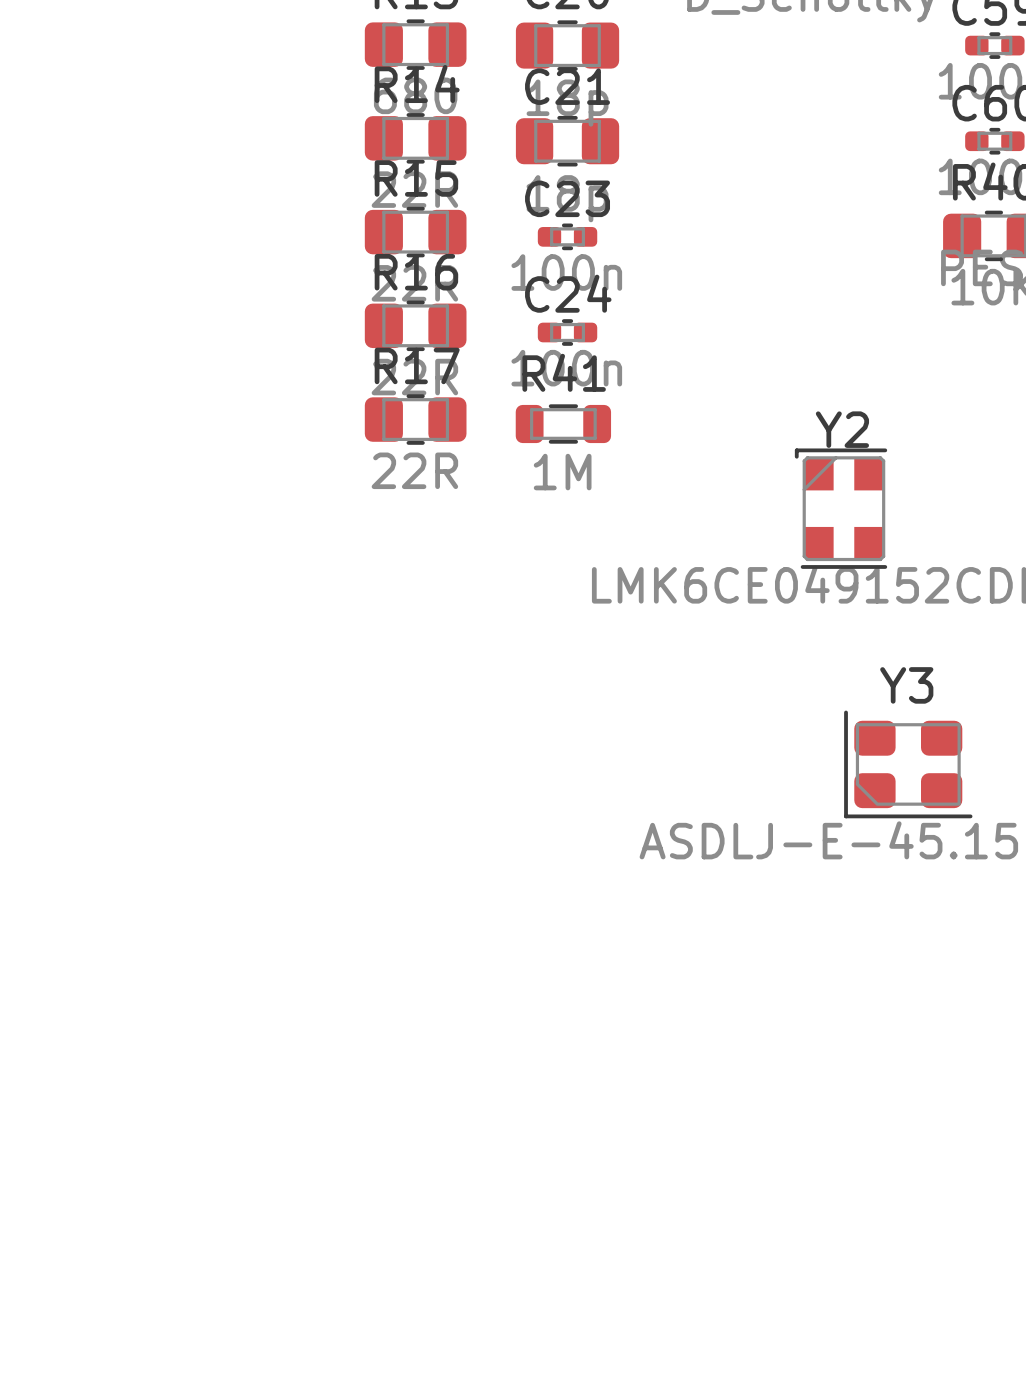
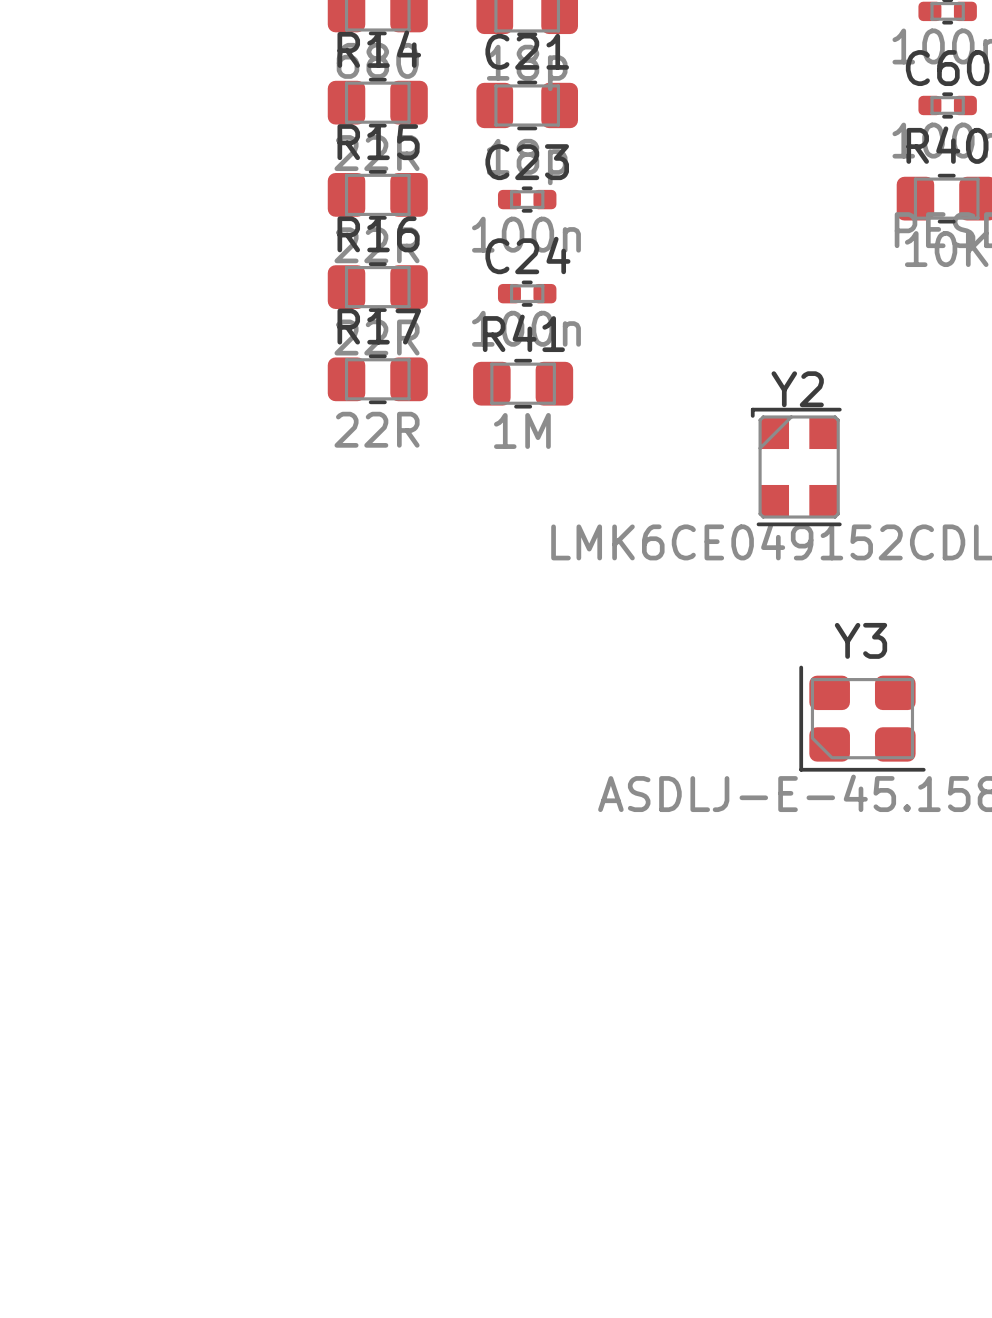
R41 footprint: [515, 404, 612, 444] -> [473, 358, 574, 409]

